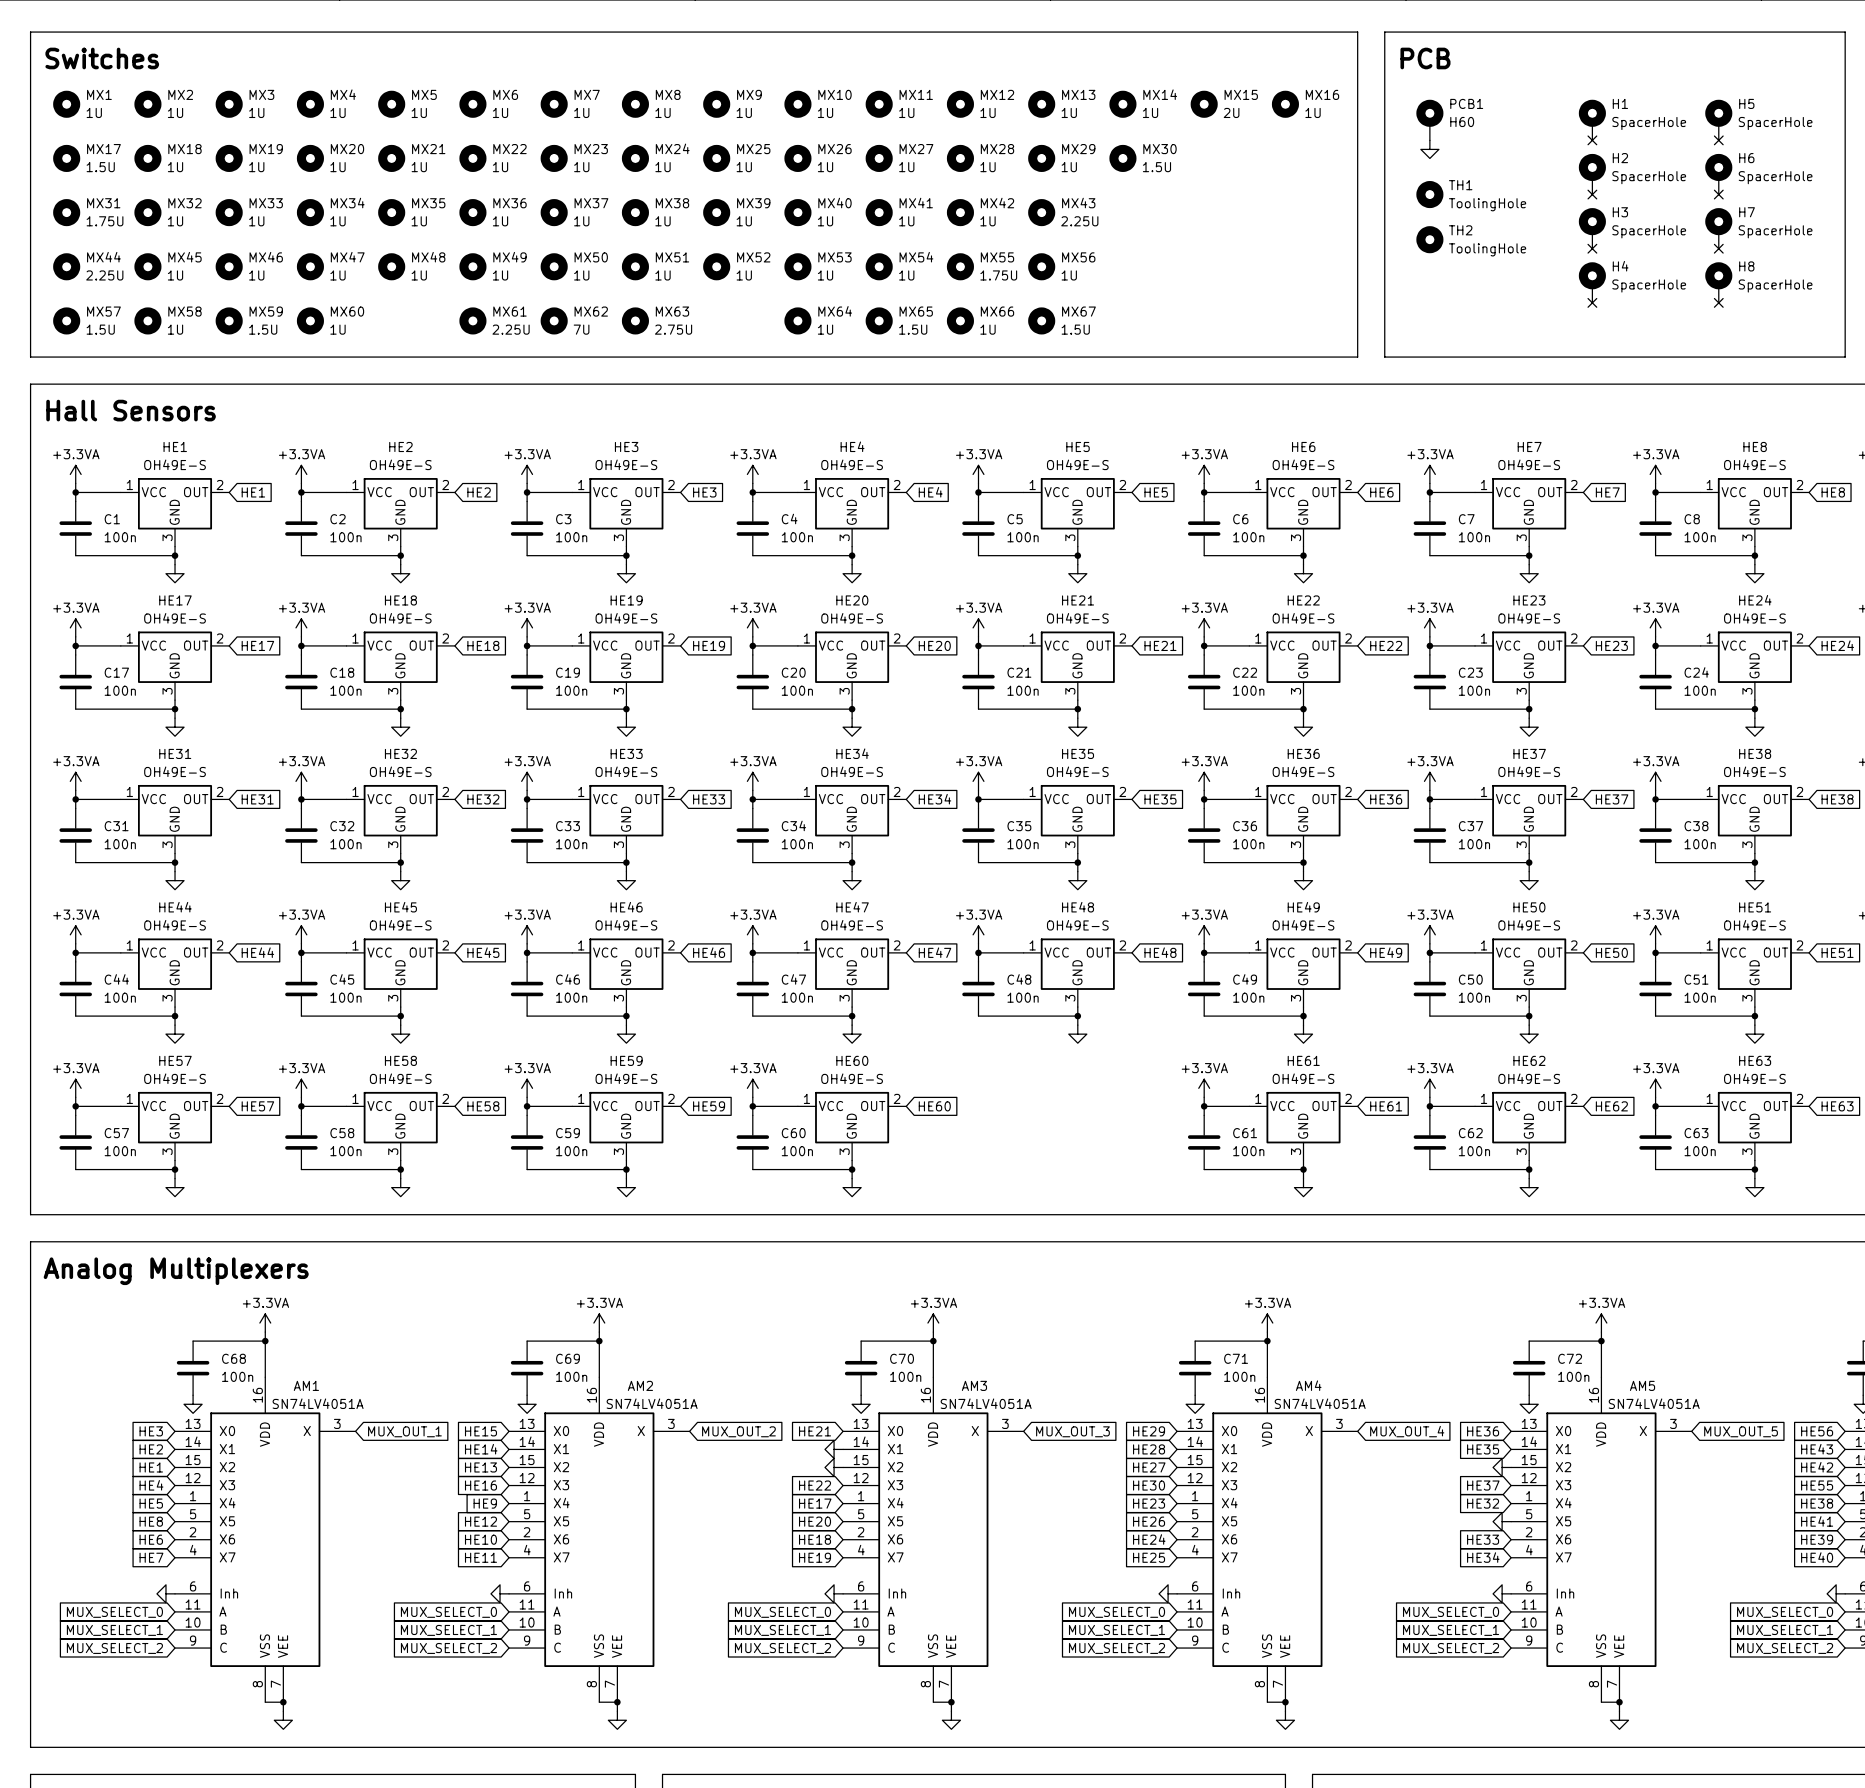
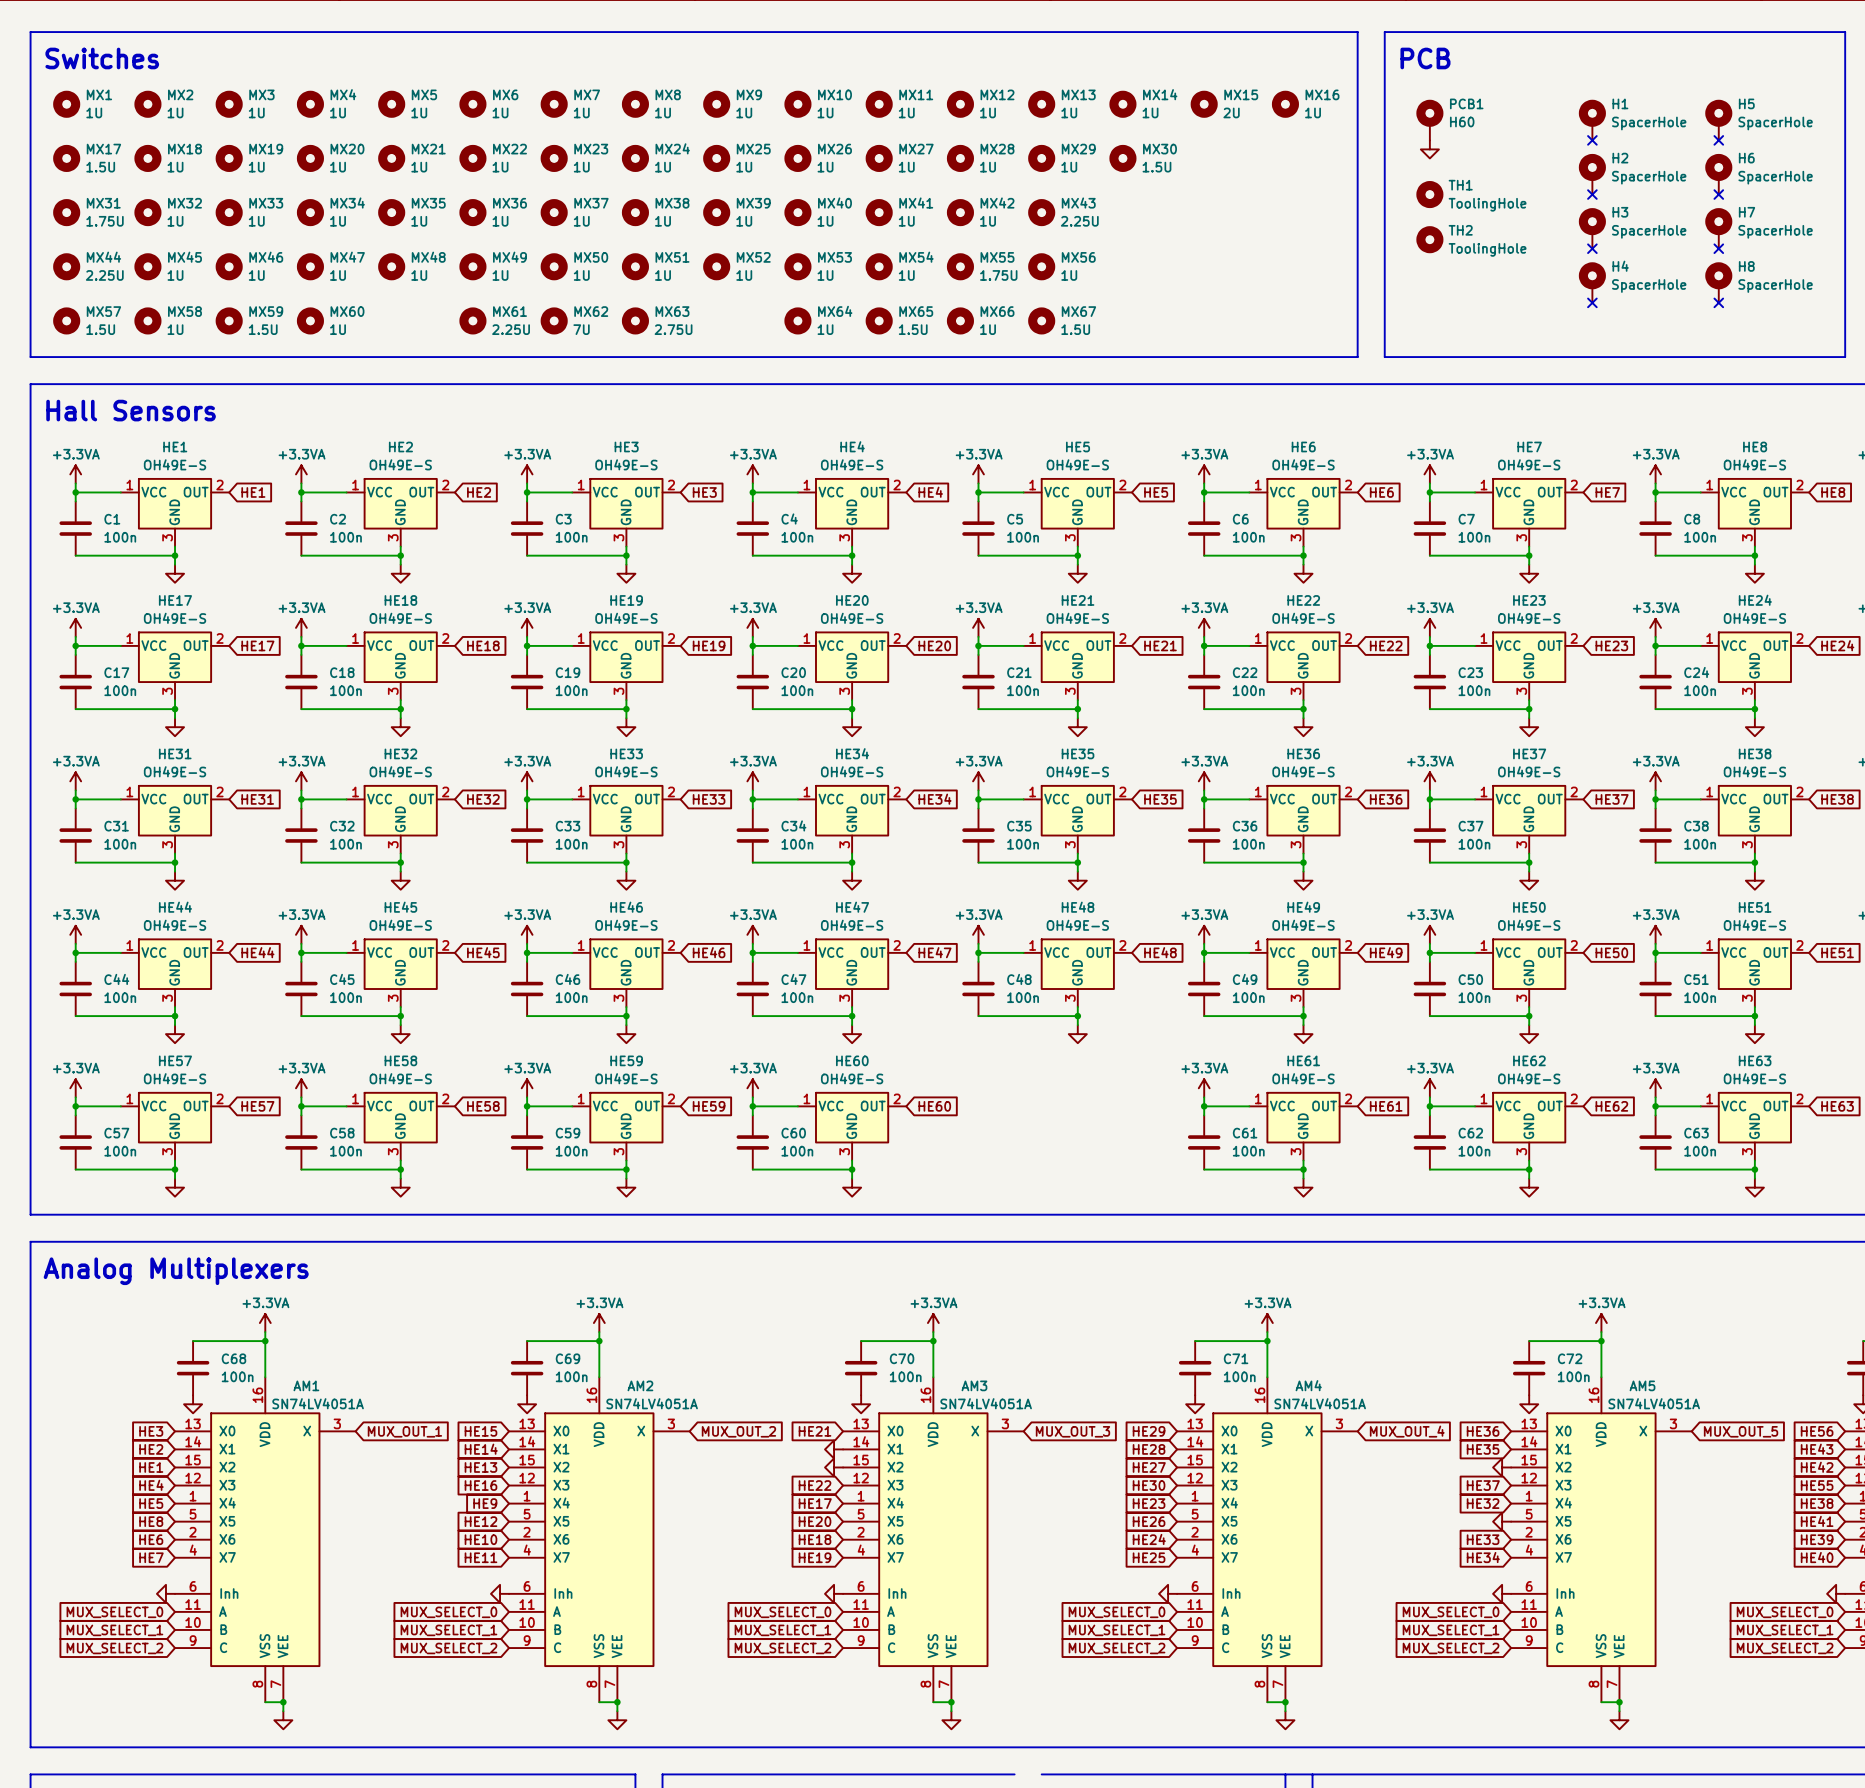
line: (1014, 1774) (1041, 1774) -> none
line: none -> (1285, 1774) (1312, 1774)

